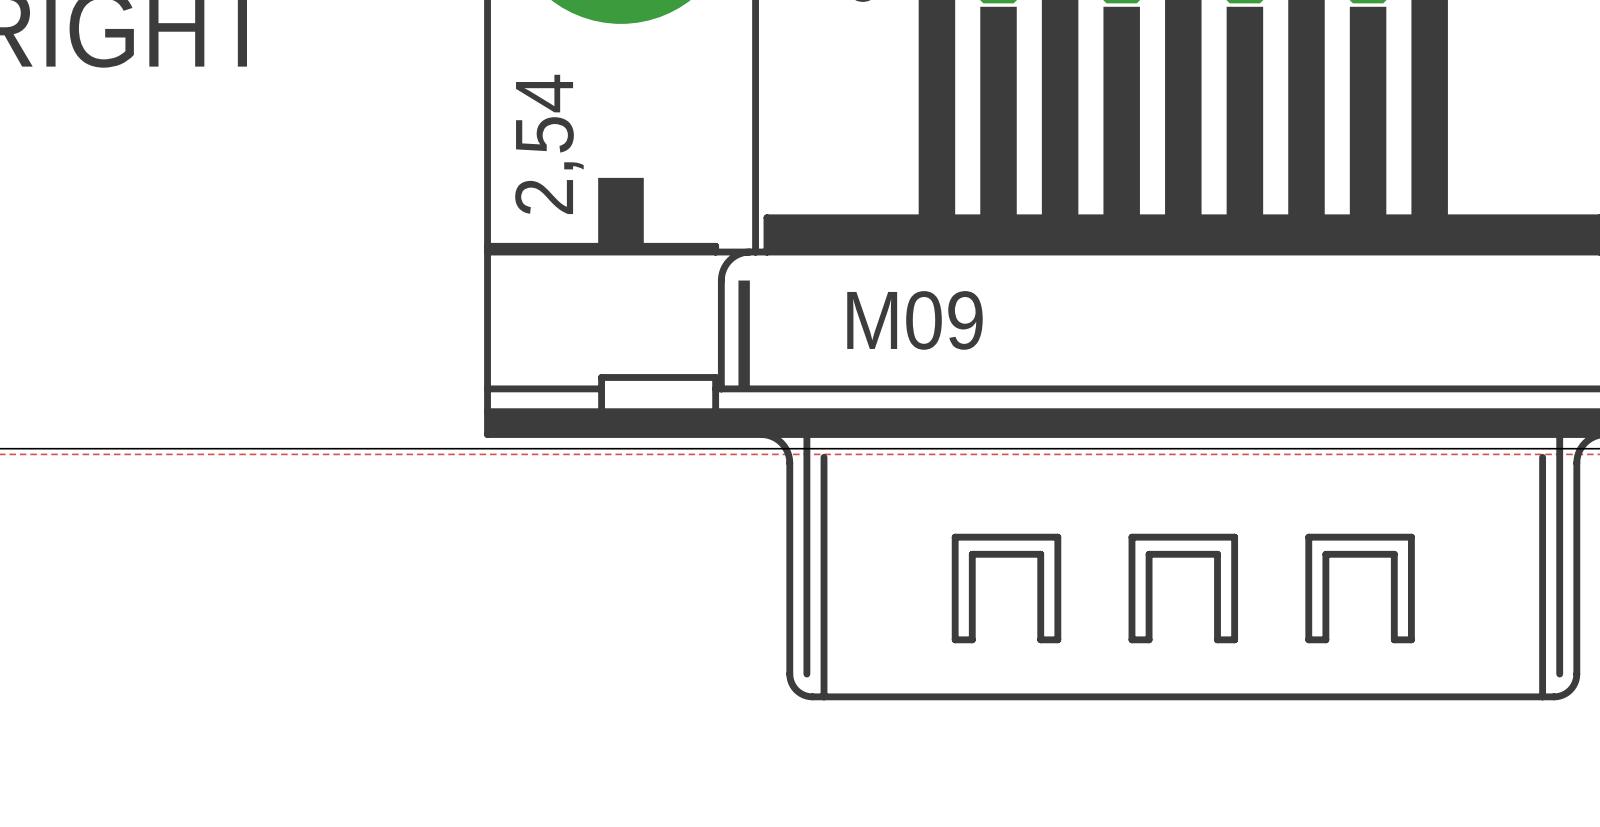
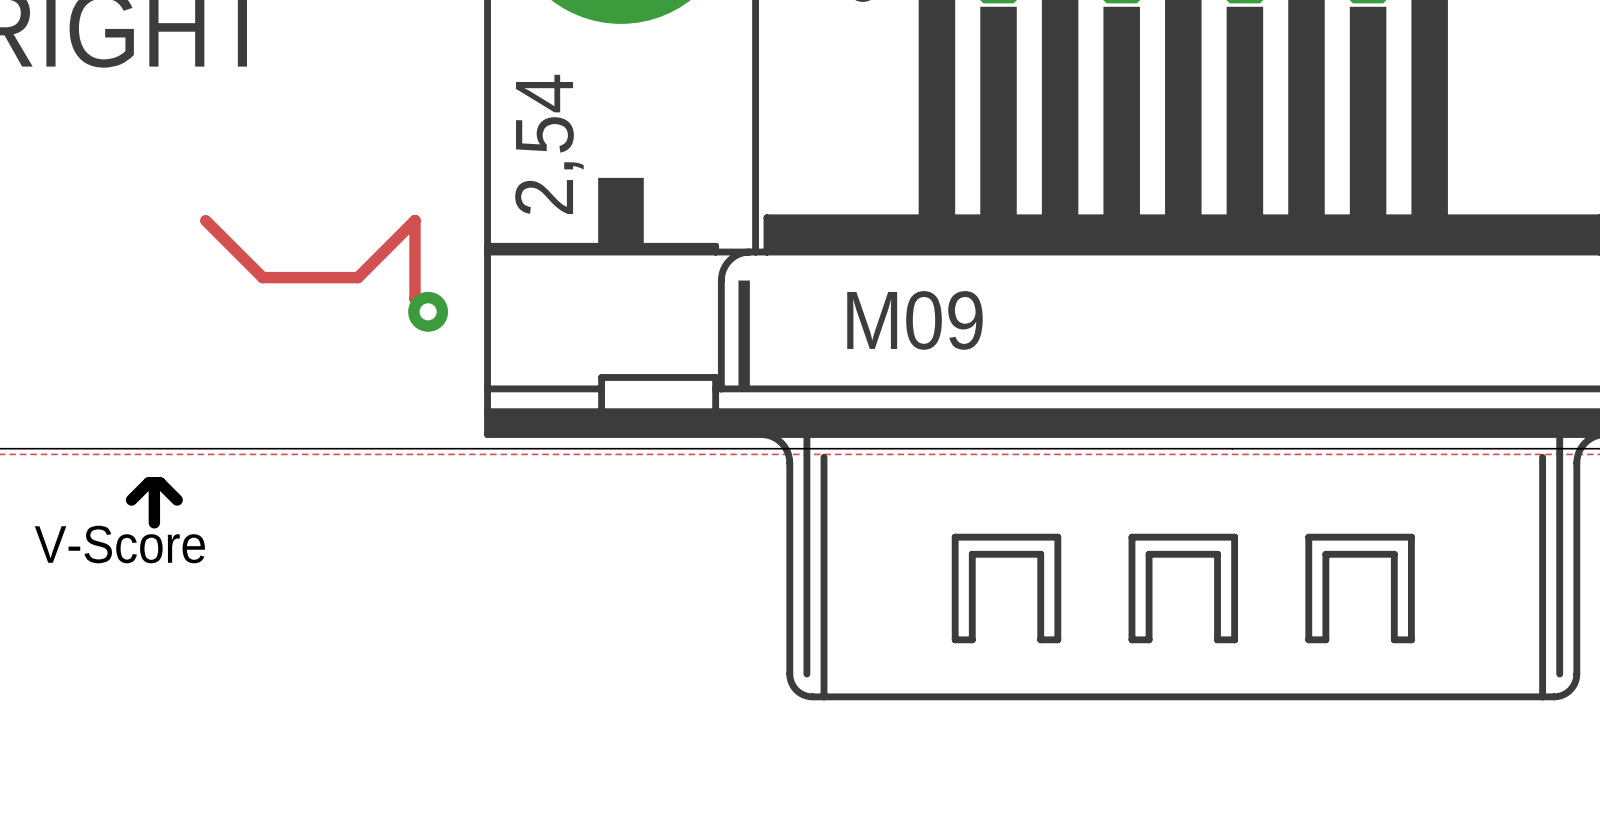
track: none -> (205, 220) (262, 277) (357, 277) (415, 220) (415, 298) (428, 311)
via: none -> (428, 311)
board edge: none -> (154, 482) (154, 522)
board edge: none -> (131, 500) (148, 482) (160, 482) (177, 500)
text: none -> V-Score (119, 544)

